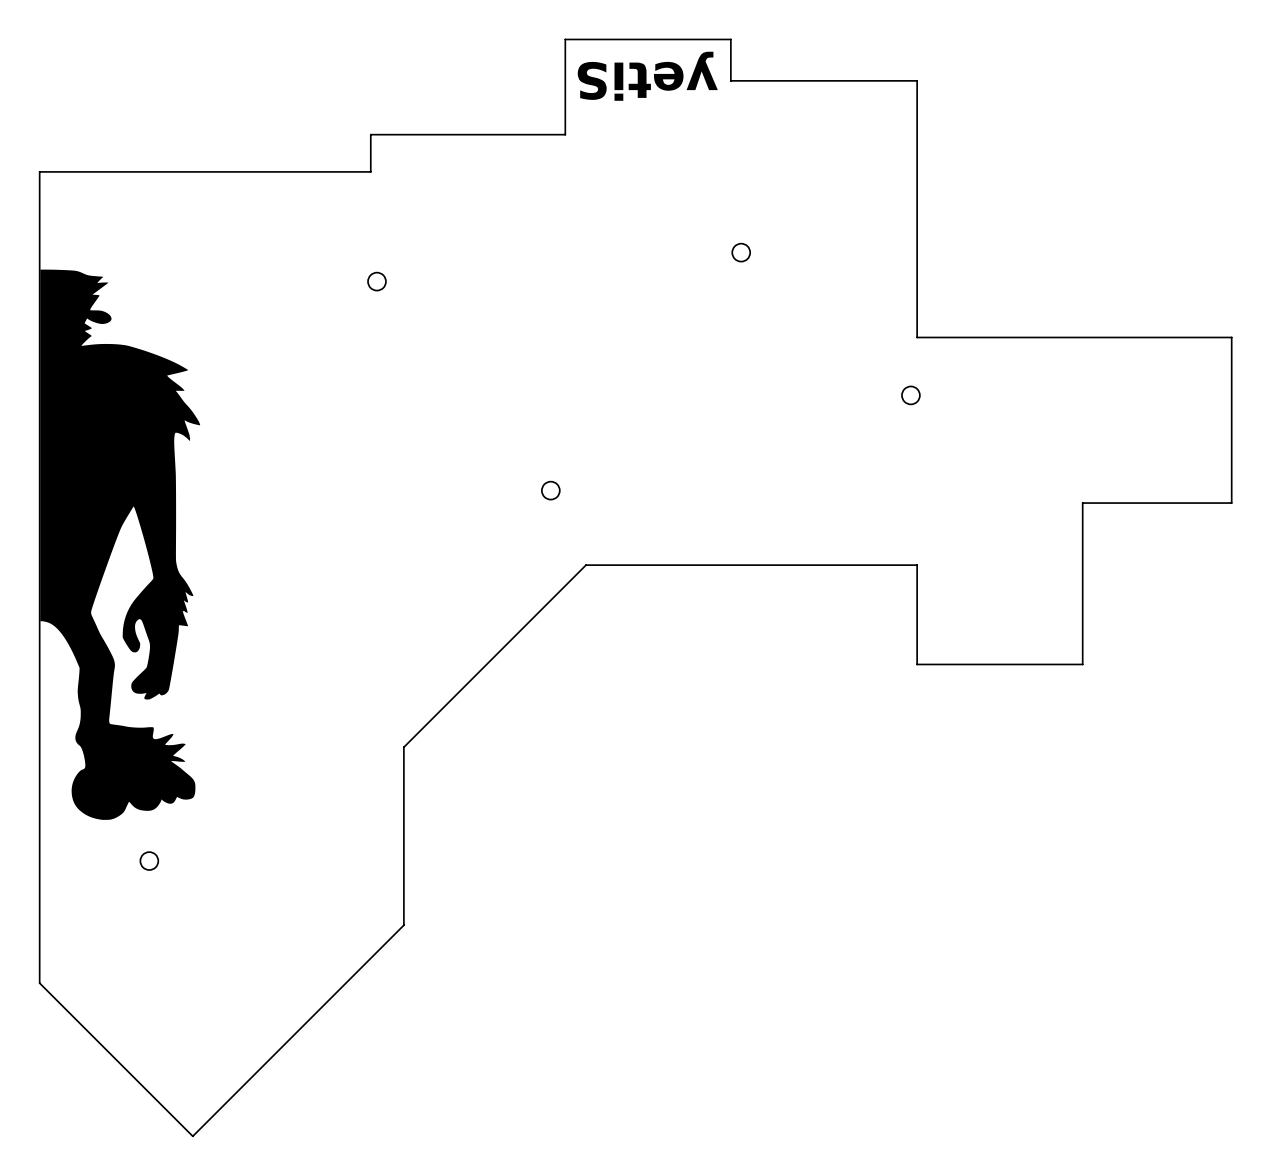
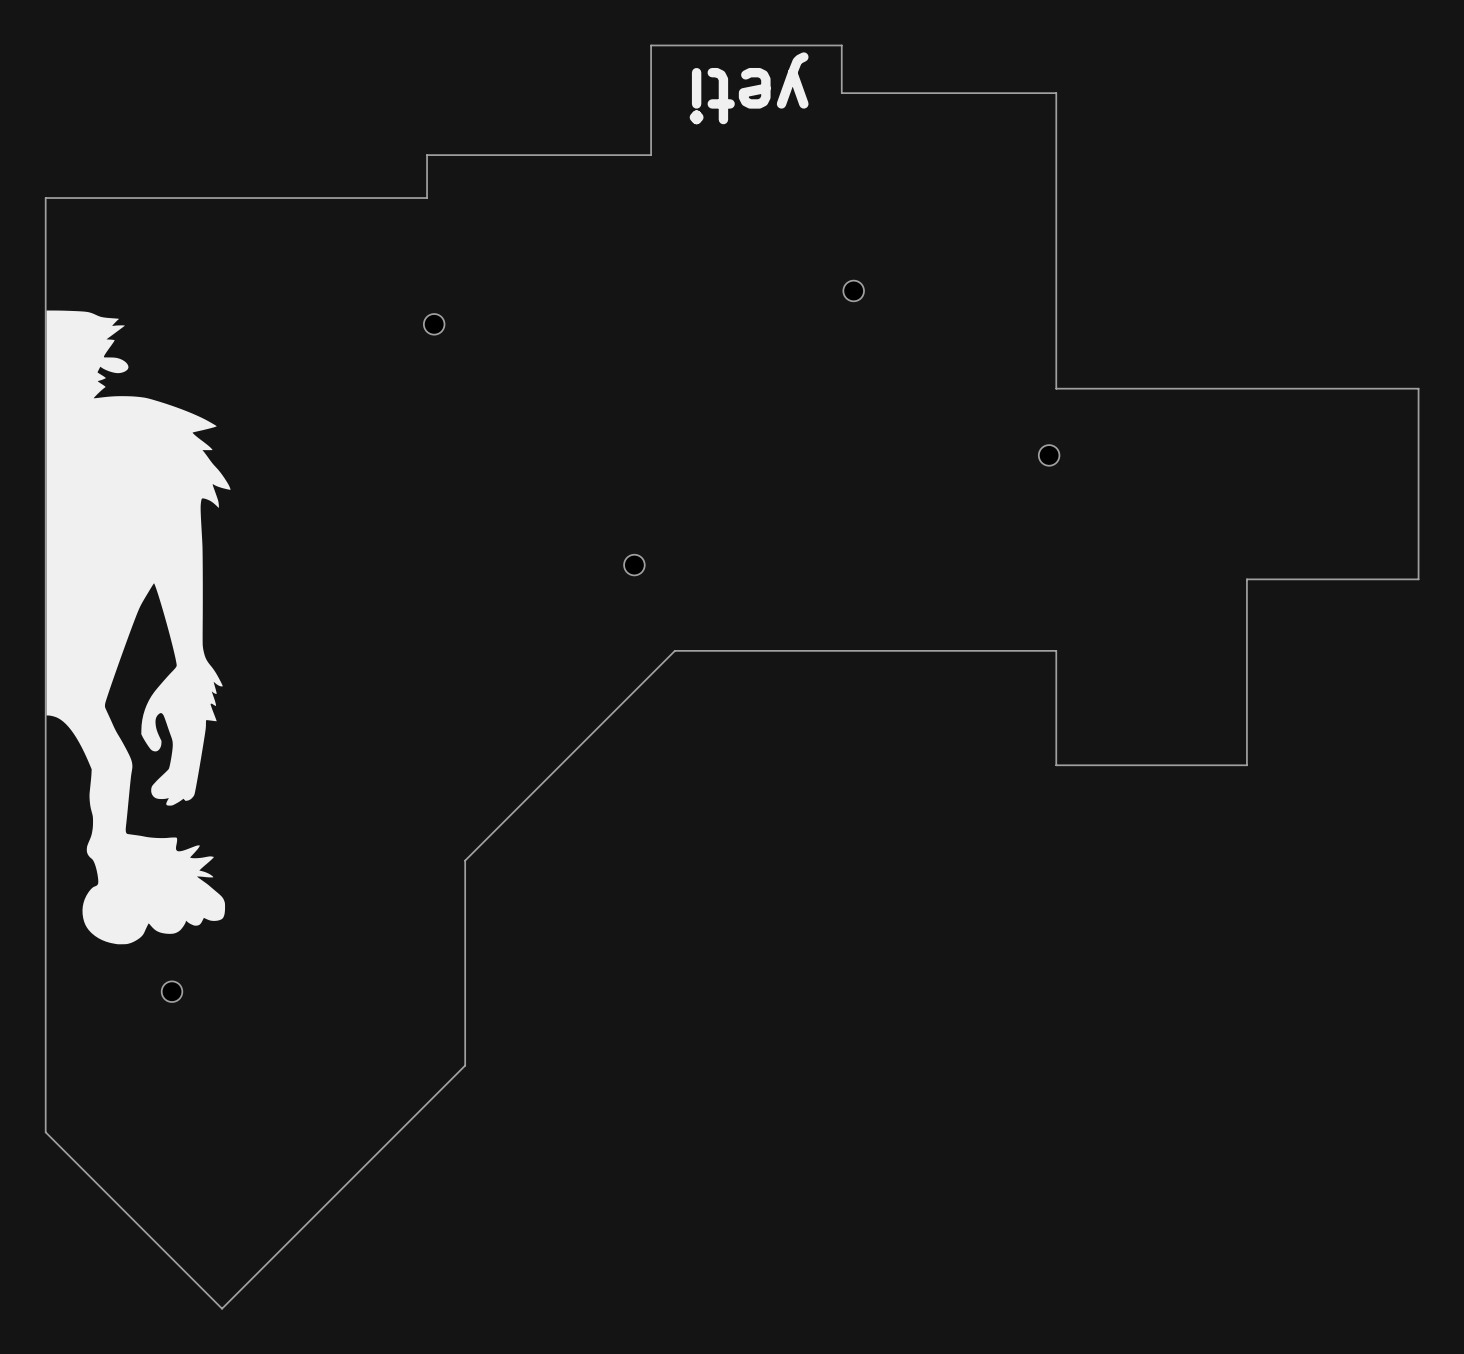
text: yetiS (647, 76) -> yeti (749, 88)

